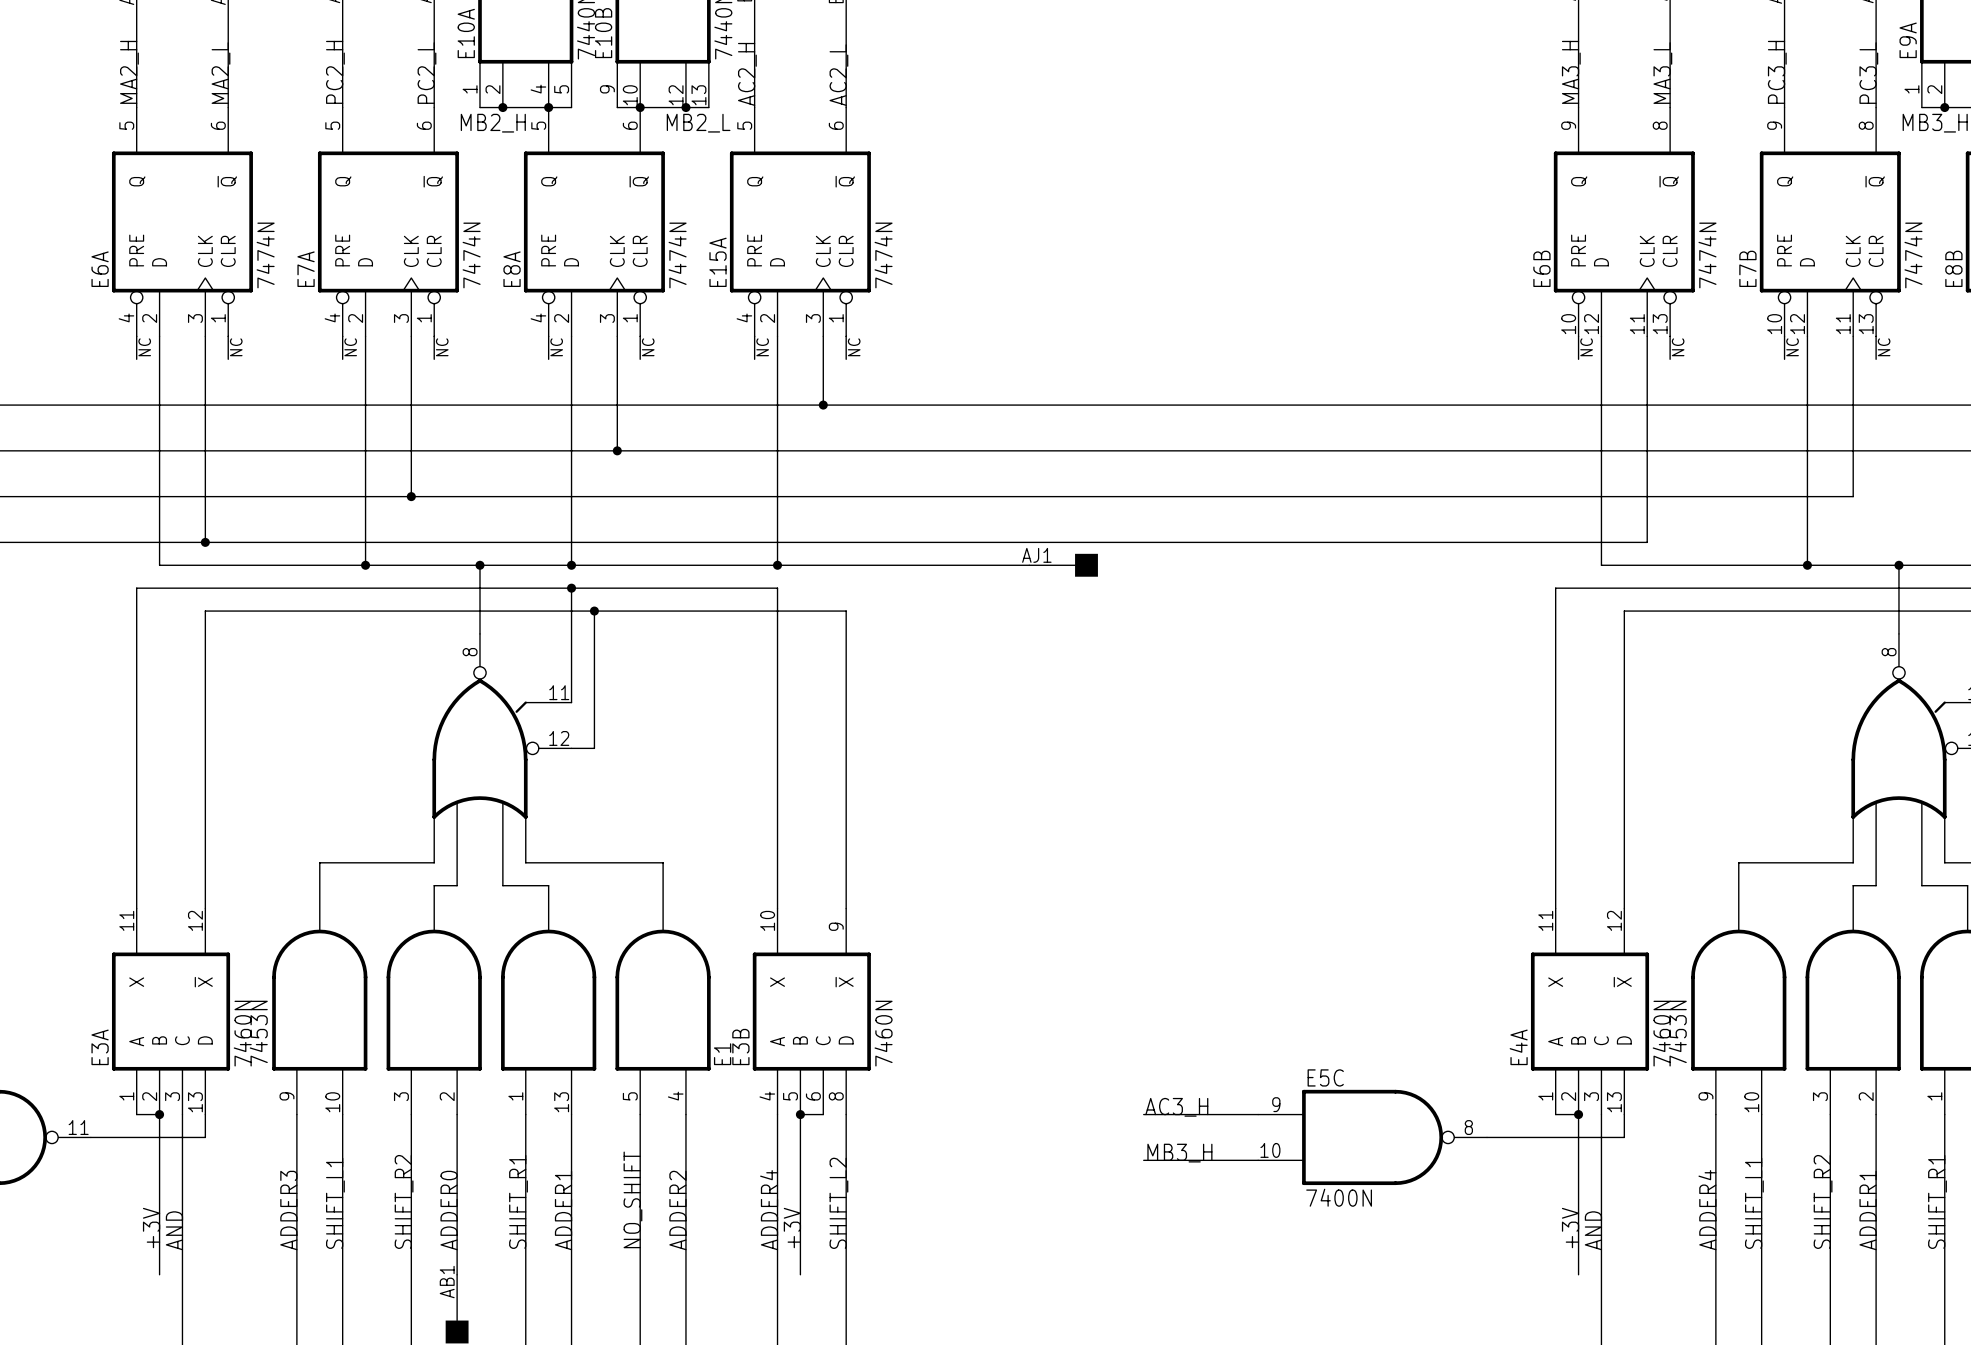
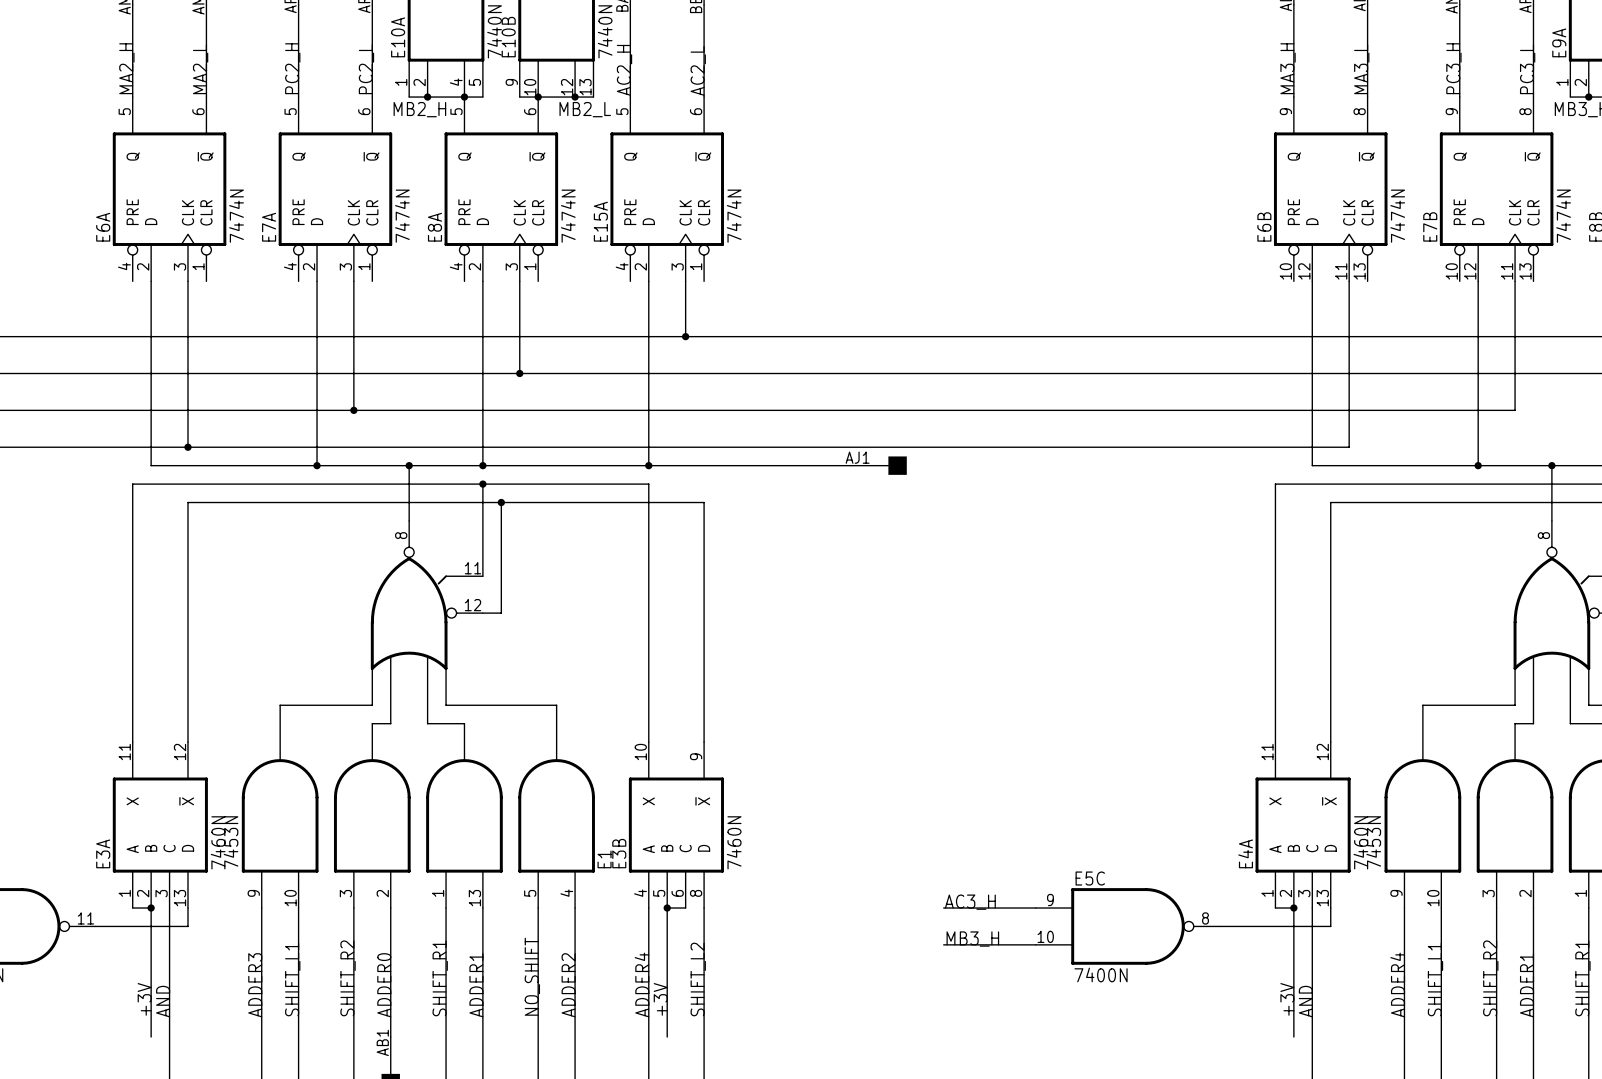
power symbol: (136, 347) -> none
power symbol: (228, 347) -> none
power symbol: (342, 347) -> none
power symbol: (434, 347) -> none
power symbol: (548, 347) -> none
power symbol: (640, 347) -> none
power symbol: (754, 347) -> none
power symbol: (846, 347) -> none
power symbol: (1578, 347) -> none
power symbol: (1670, 347) -> none
power symbol: (1784, 347) -> none
power symbol: (1876, 347) -> none

